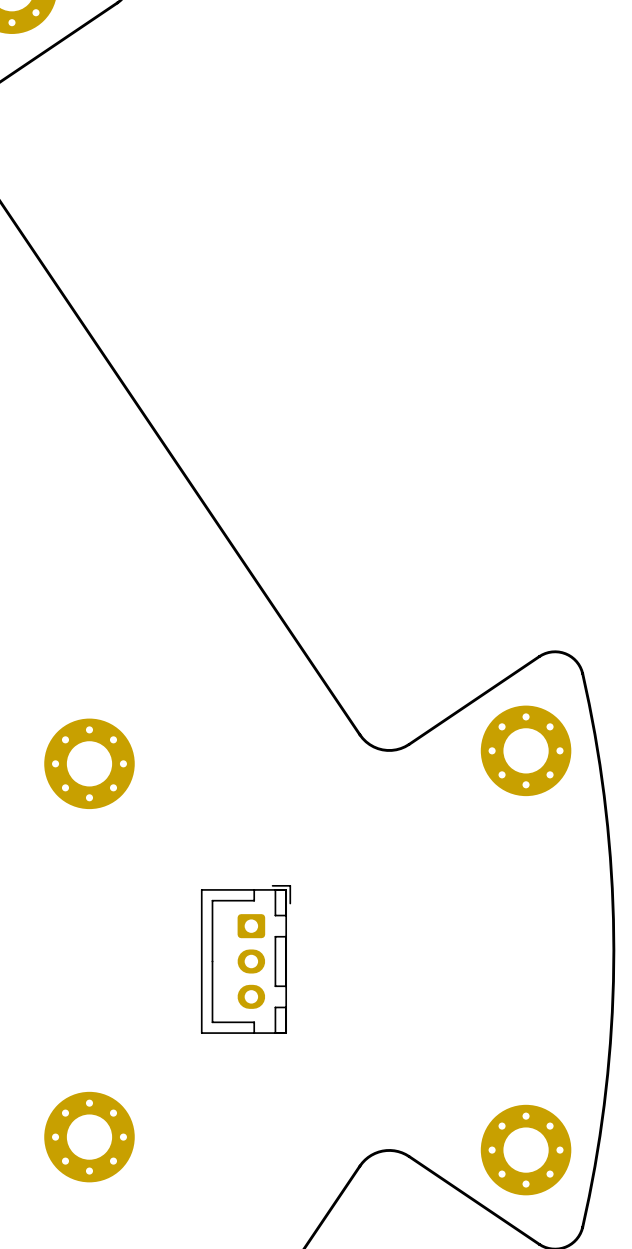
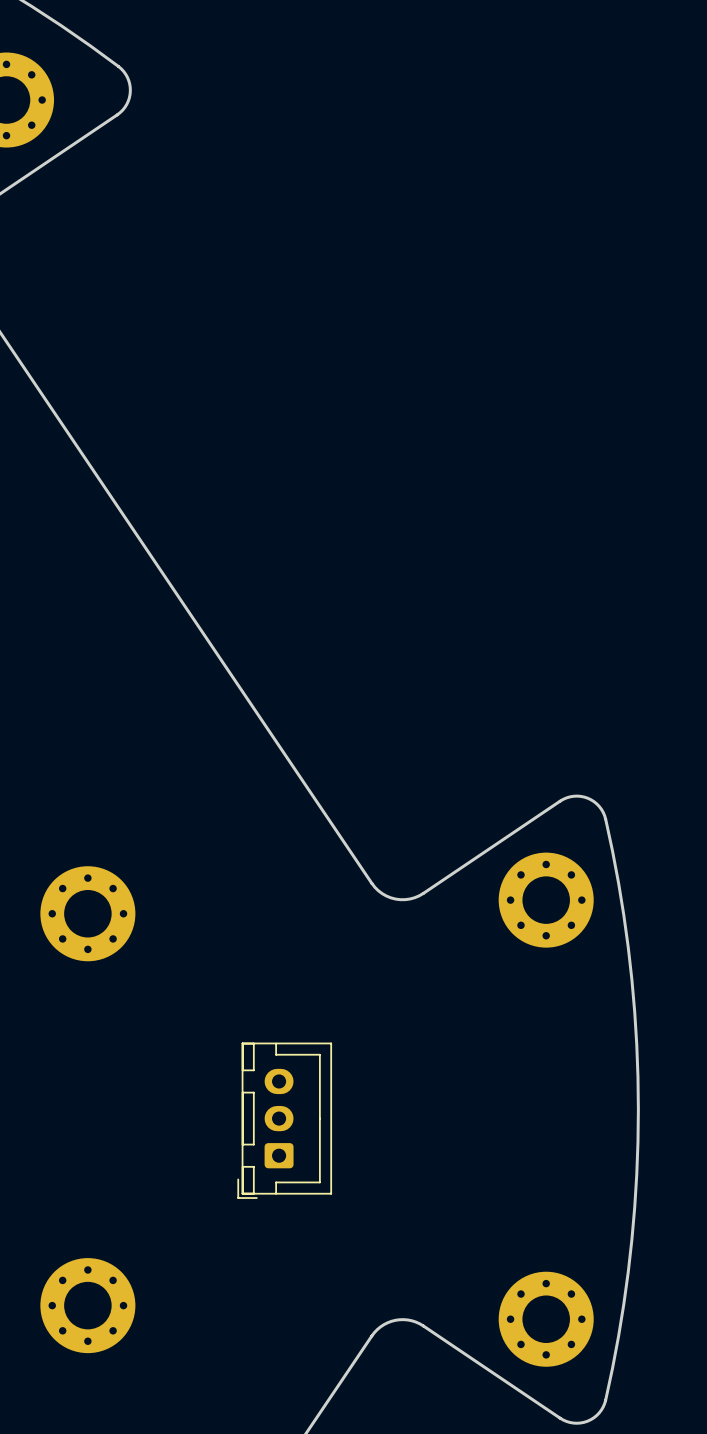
part rotation: 0° (246, 959) -> 180° (284, 1120)

